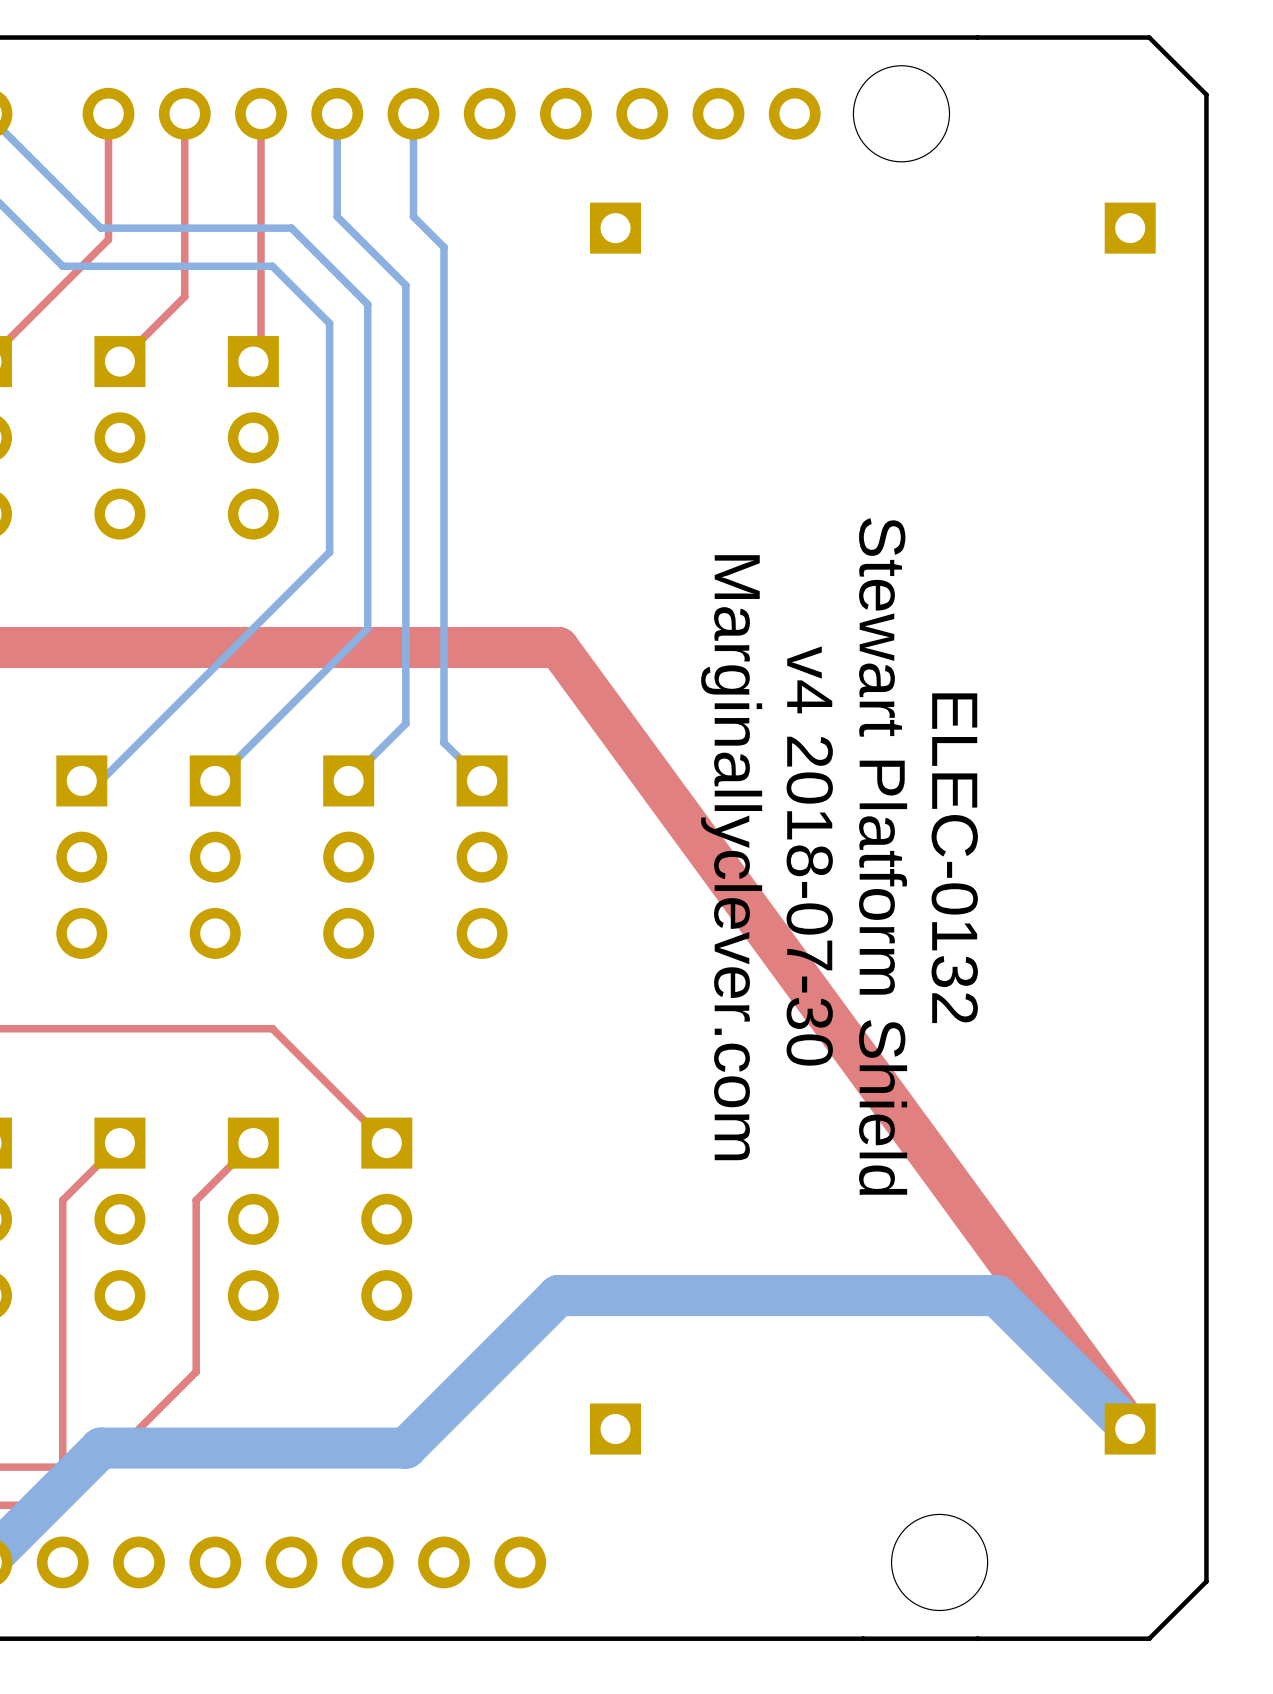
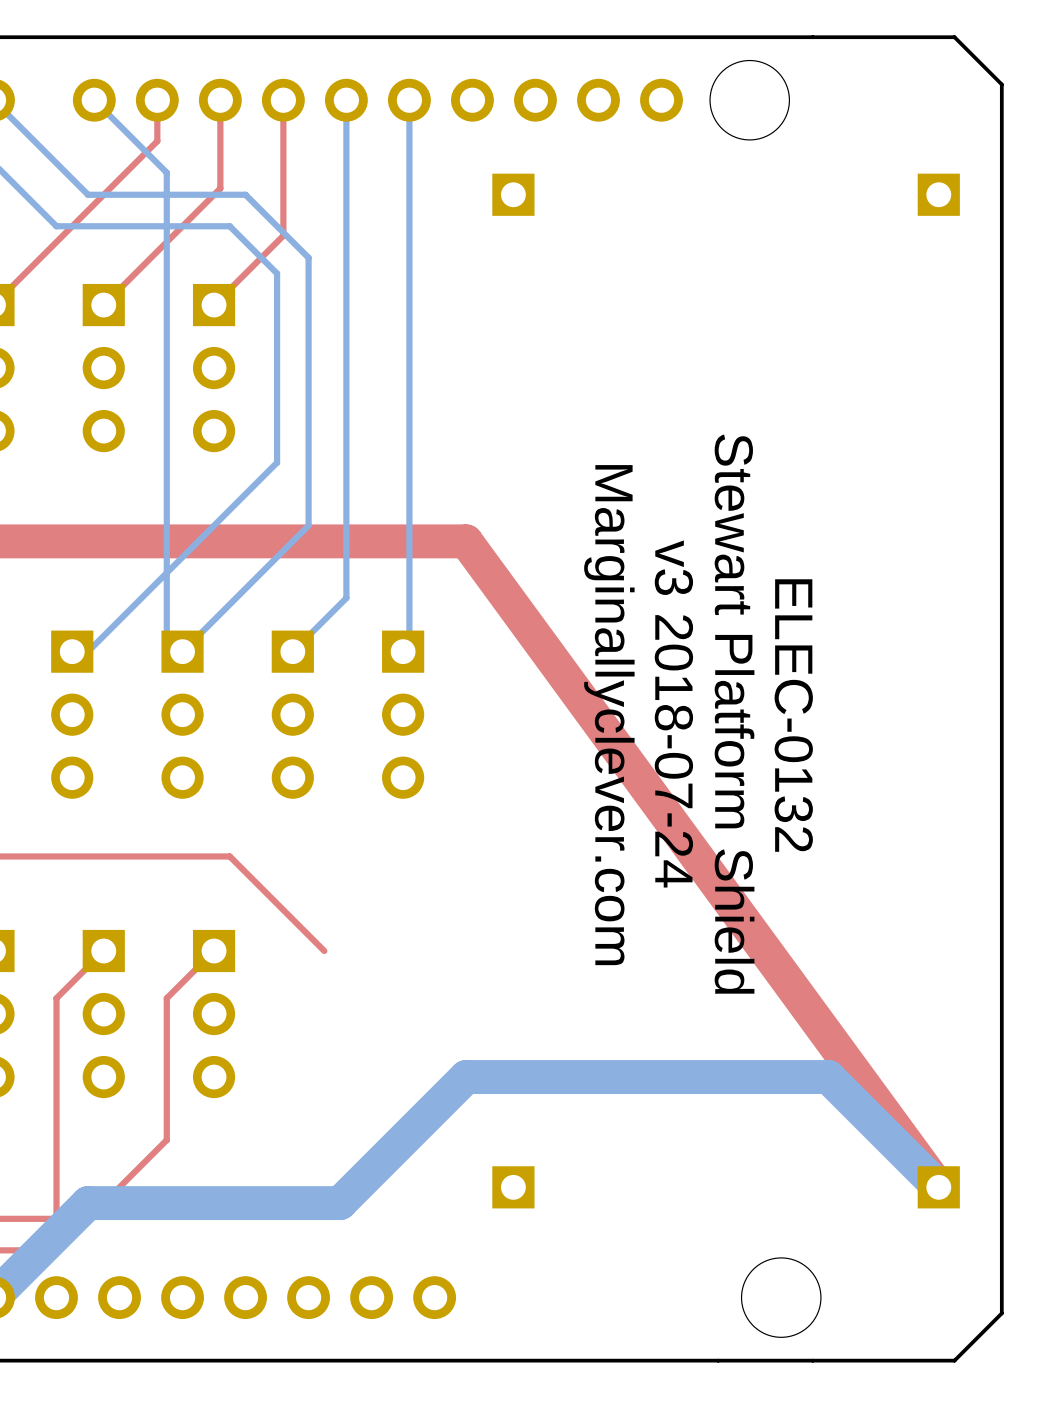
top track: (108, 113) (108, 239) -> (157, 141) (94, 204)
bottom track: none -> (94, 100) (166, 172) (166, 635)
bottom track: (337, 113) (337, 216) (405, 285) (405, 723) -> none
bottom track: none -> (409, 100) (409, 645)
top track: (184, 163) (184, 296) -> (220, 188) (157, 251)
bottom track: (413, 216) (443, 247) (443, 742) (482, 780) -> (346, 185) (346, 598) (340, 604)
top track: (260, 220) (260, 353) -> (283, 100) (283, 235) (220, 298)
text: v4 2018-07-30 (809, 856) -> v3 2018-07-24 (673, 713)
part: (386, 1219) -> none

